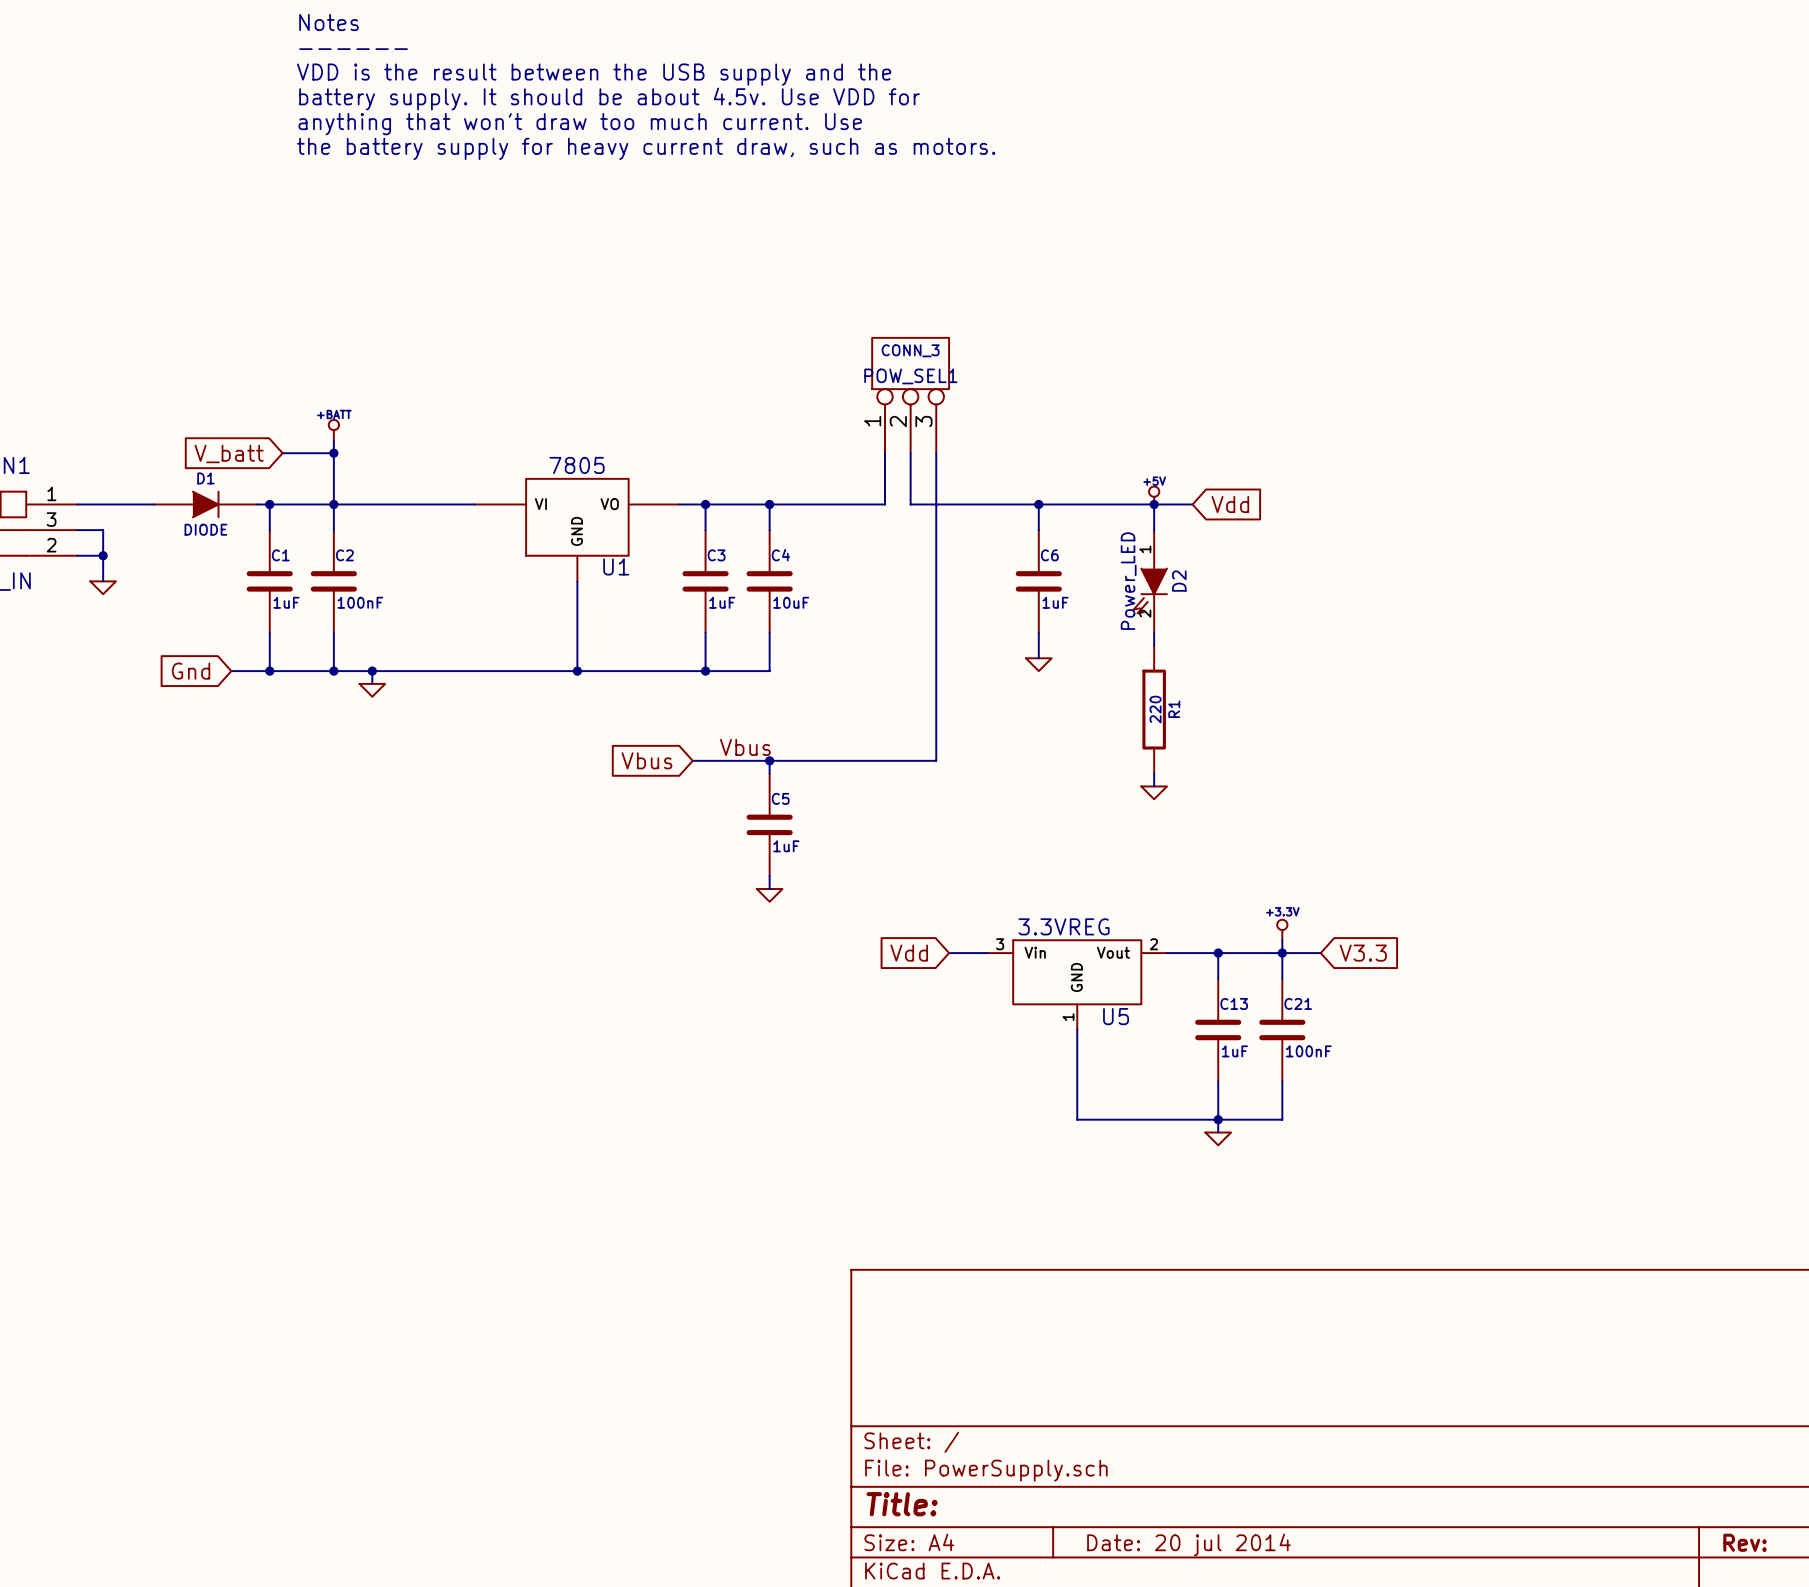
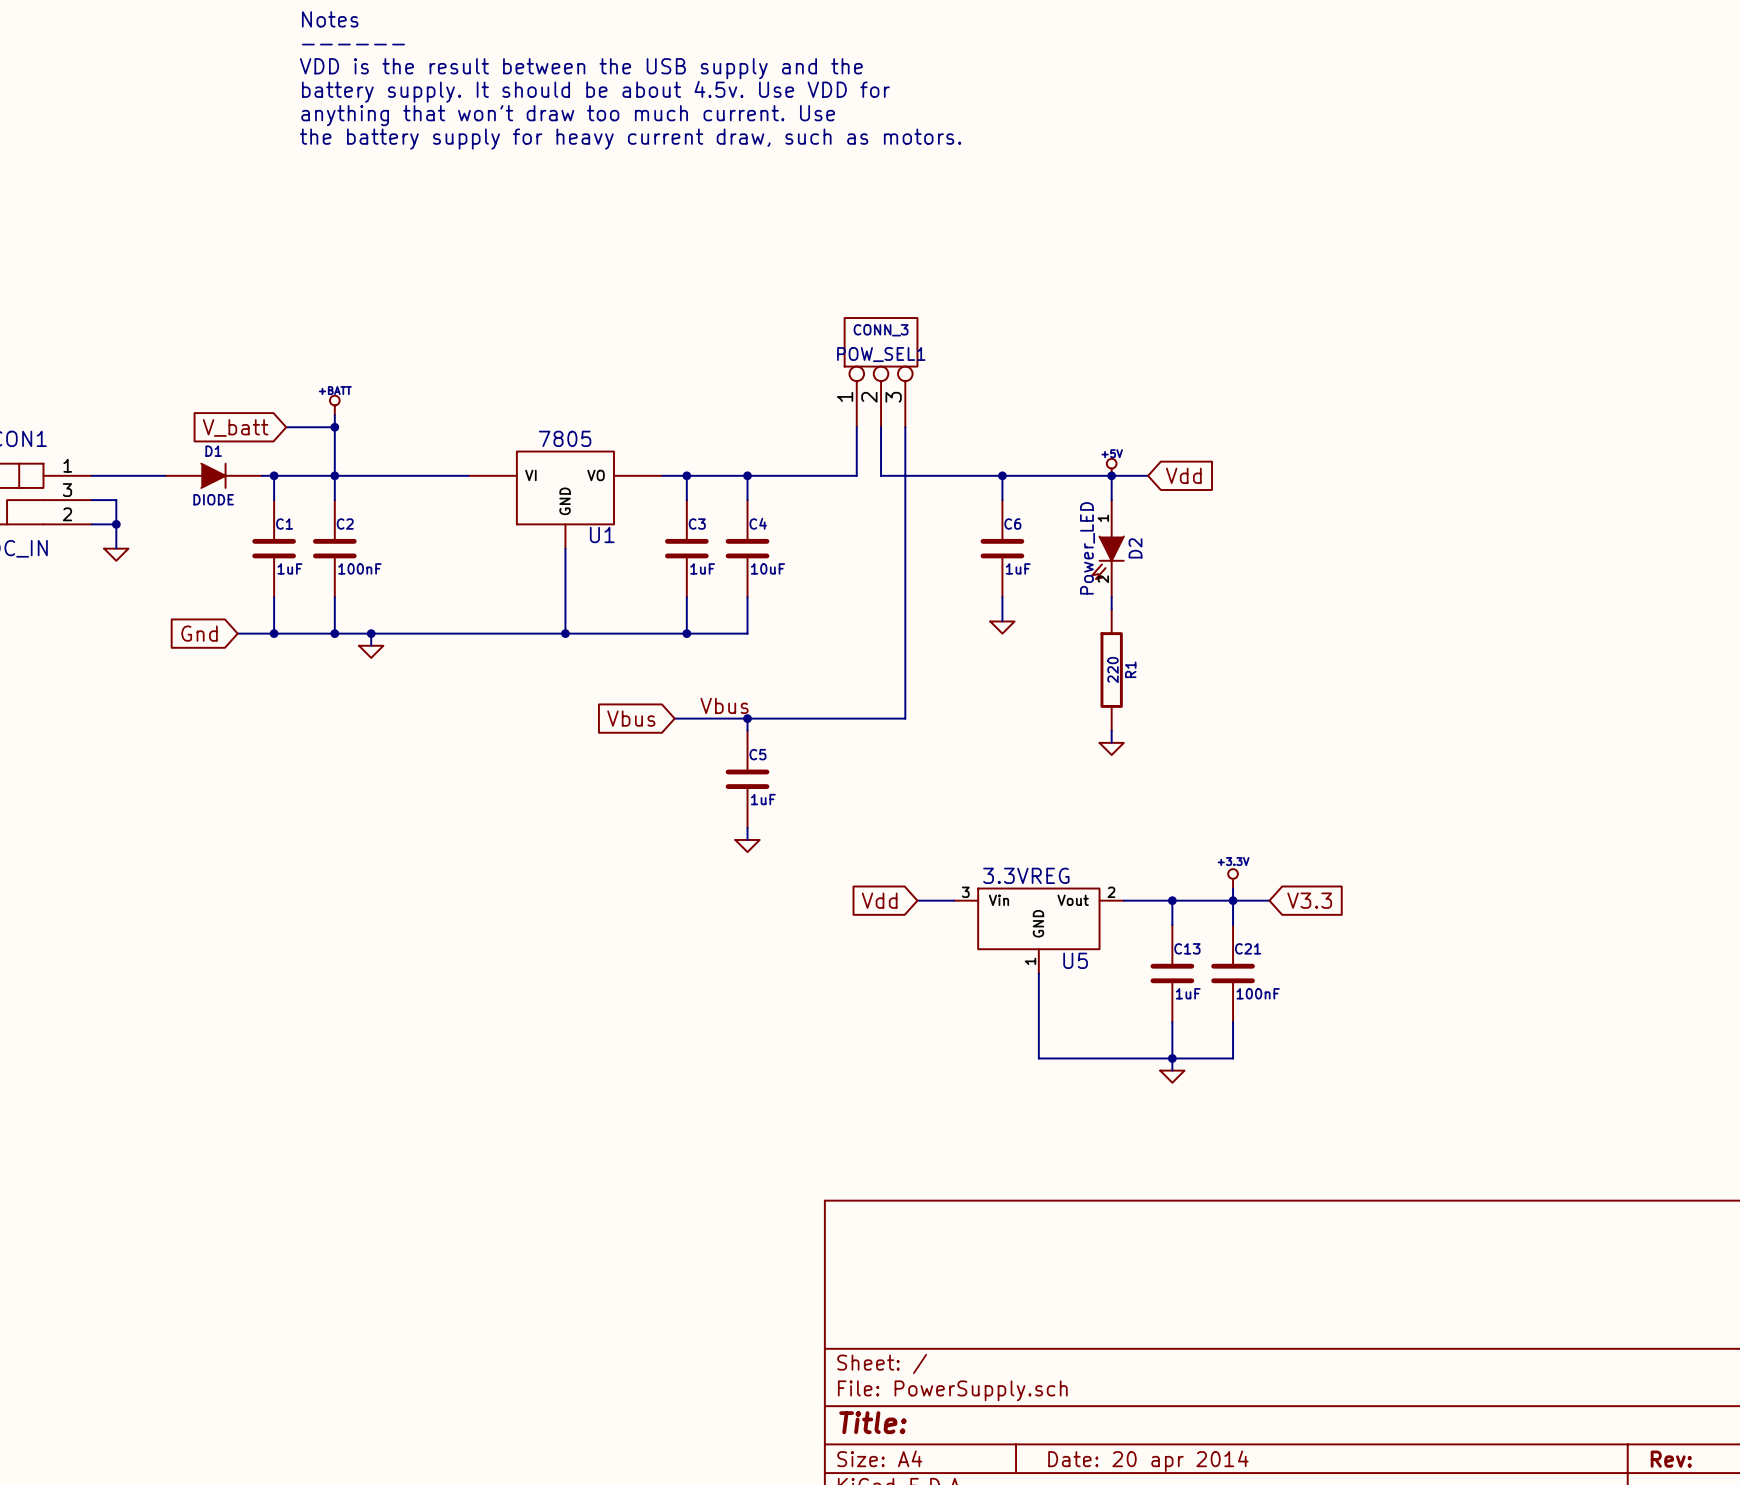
title block: Date: 20 jul 2014 (1188, 1544) -> Date: 20 apr 2014 (1148, 1461)

